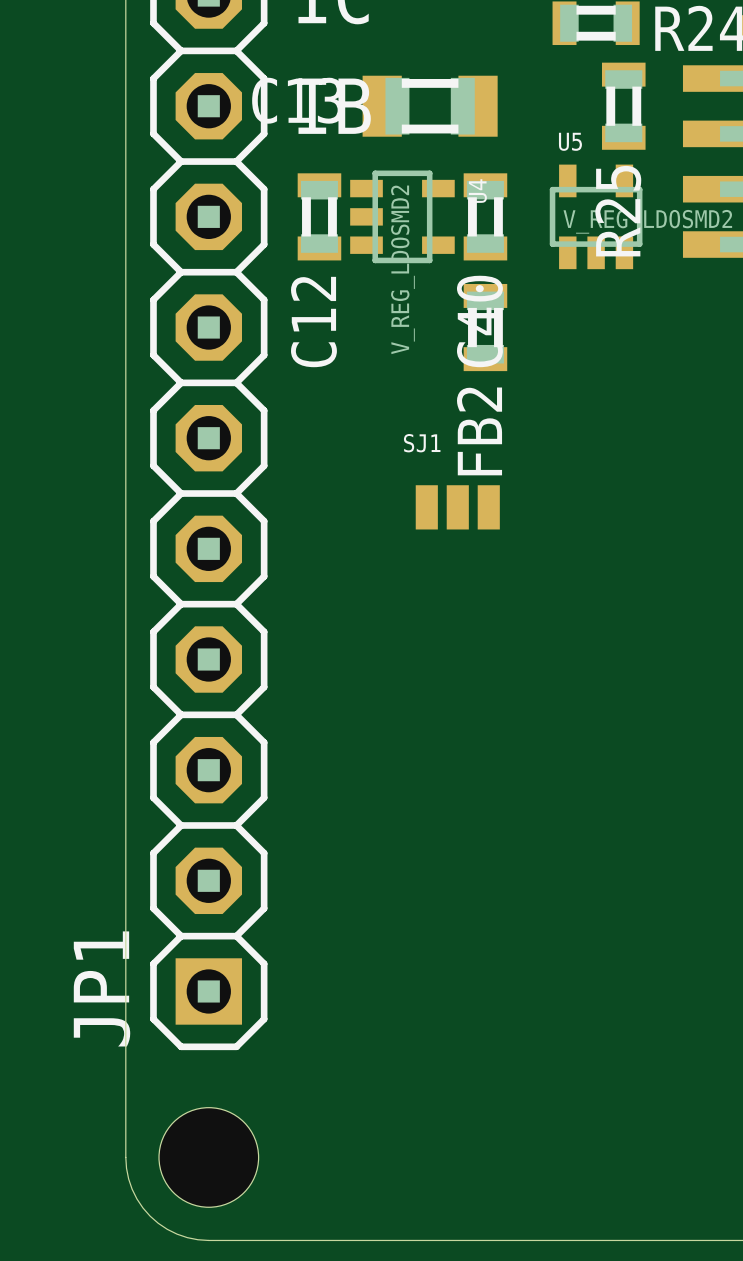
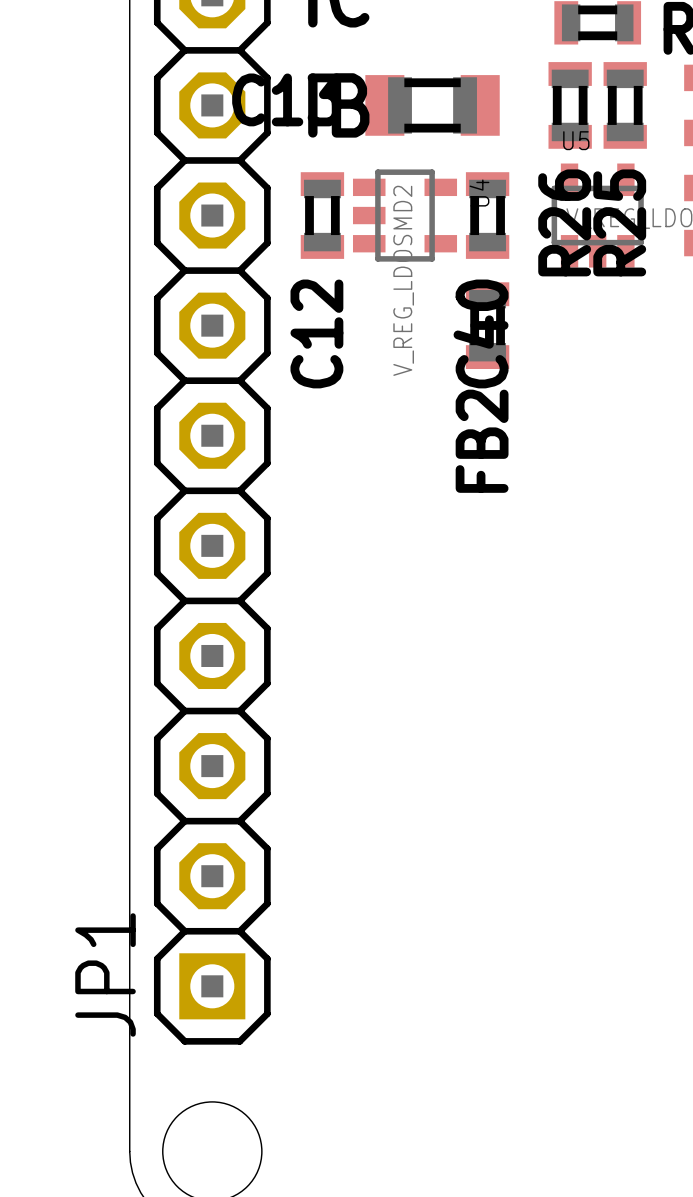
R26: none -> (570, 105)
SJ1: (457, 507) -> none

